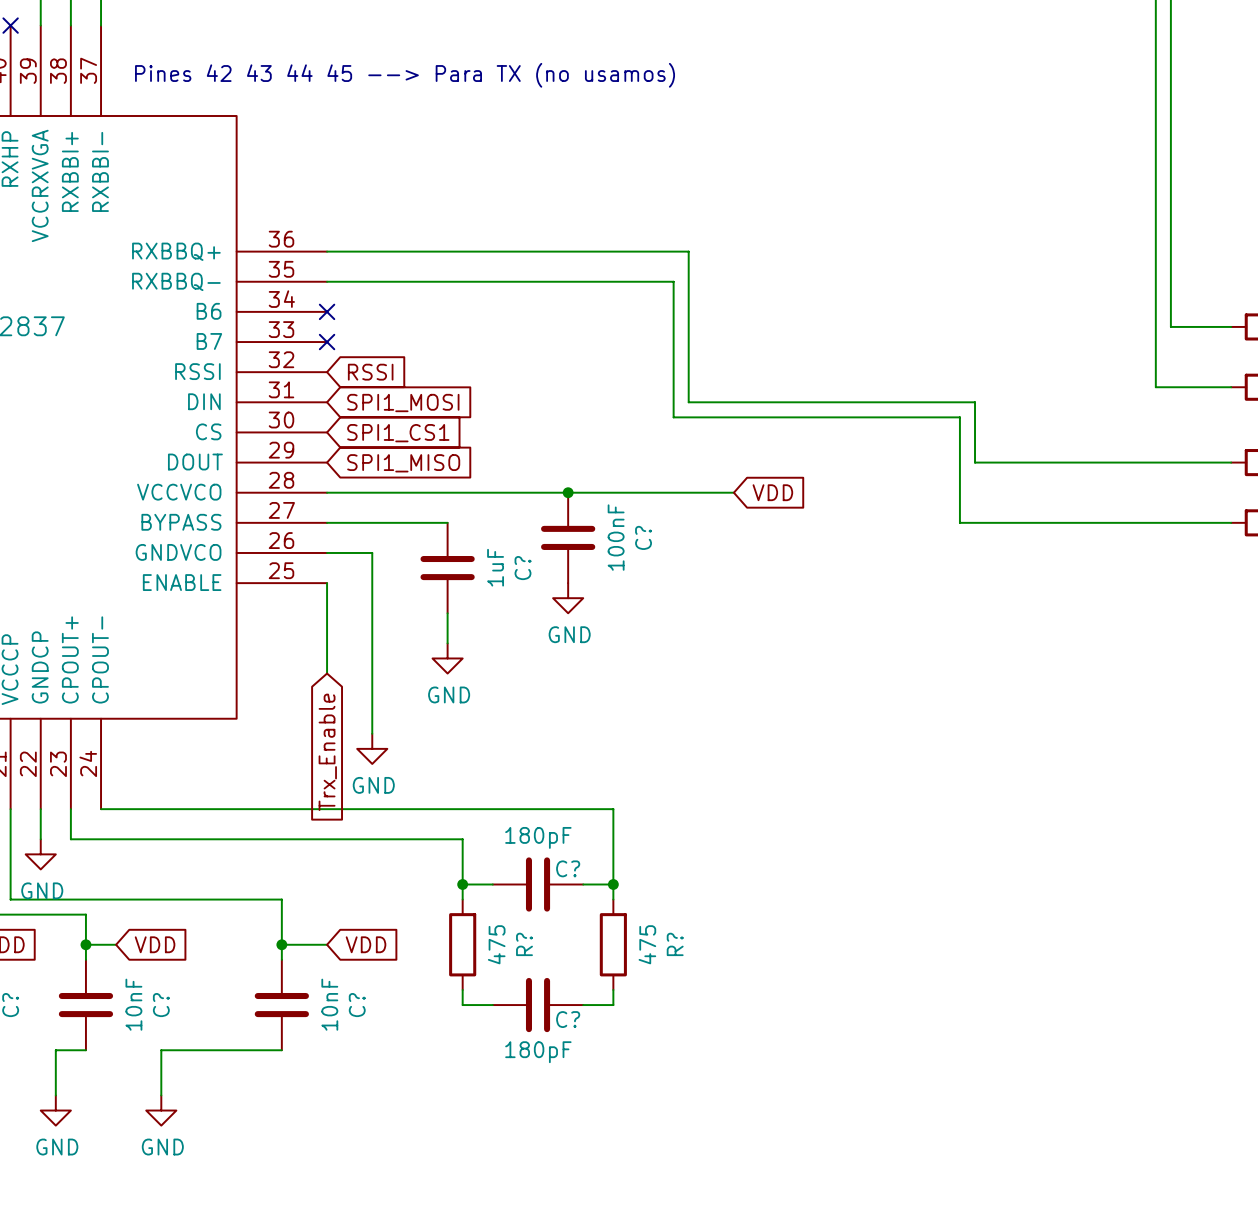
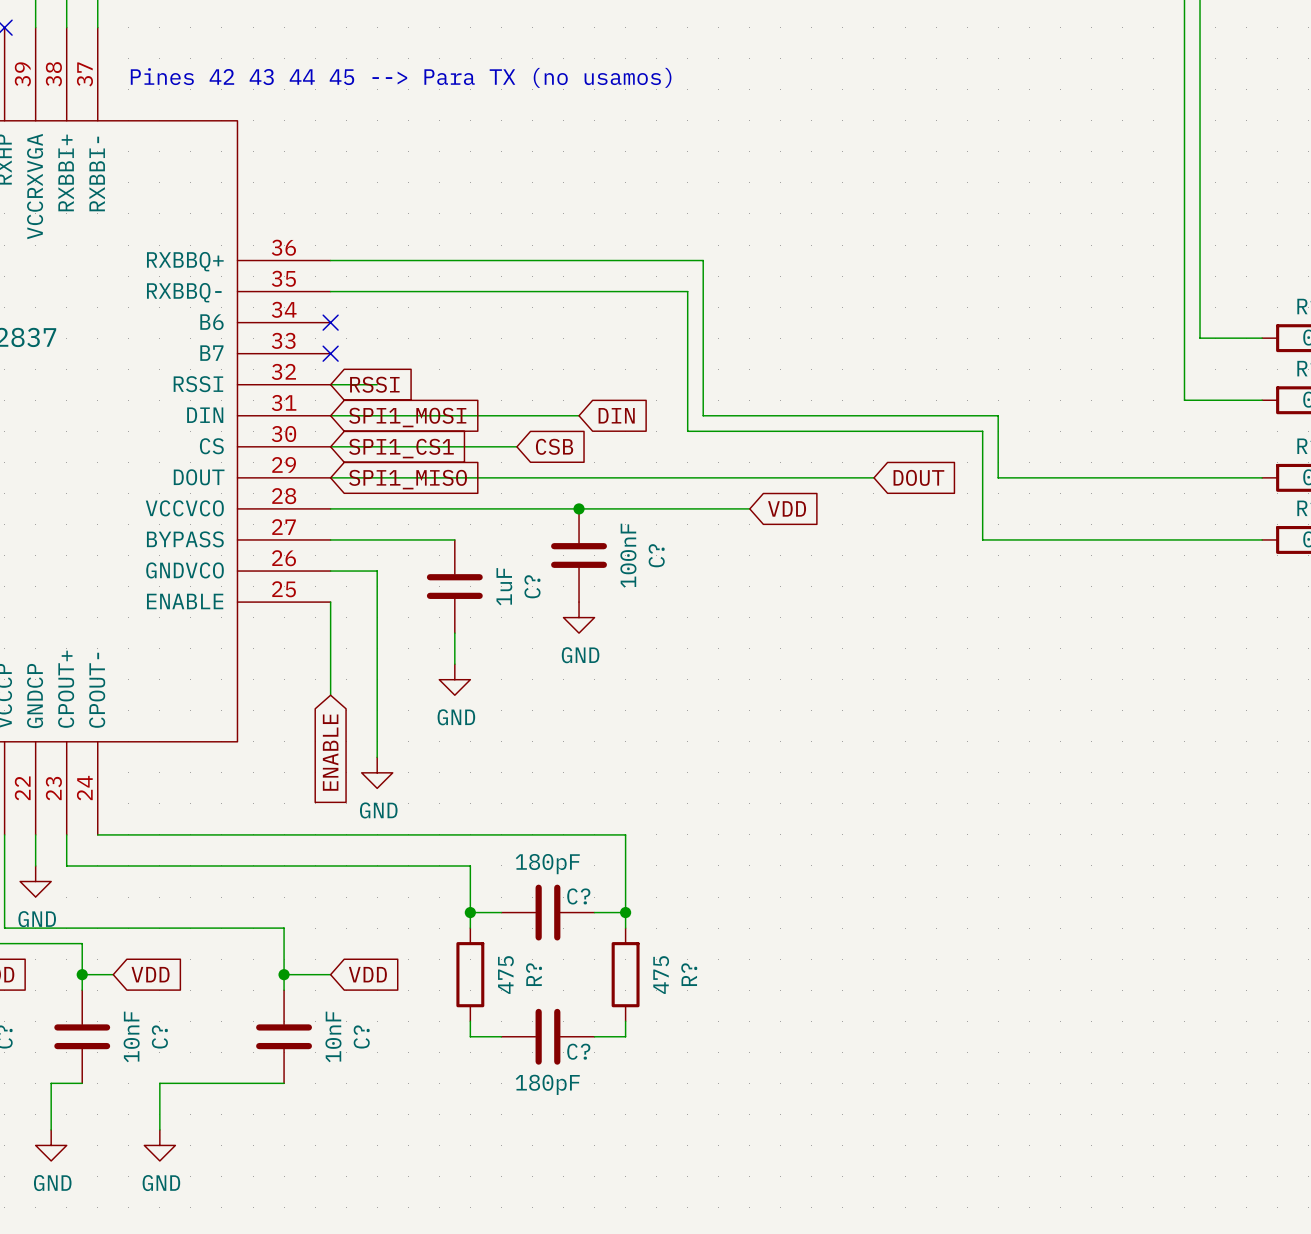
wire: none -> (330, 384) (377, 384)
wire: none -> (330, 415) (579, 415)
global label: none -> DIN (616, 415)
wire: none -> (330, 446) (516, 446)
global label: none -> CSB (554, 446)
wire: none -> (330, 477) (873, 477)
global label: none -> DOUT (918, 477)
global label: Trx_Enable (327, 752) -> ENABLE (330, 752)

